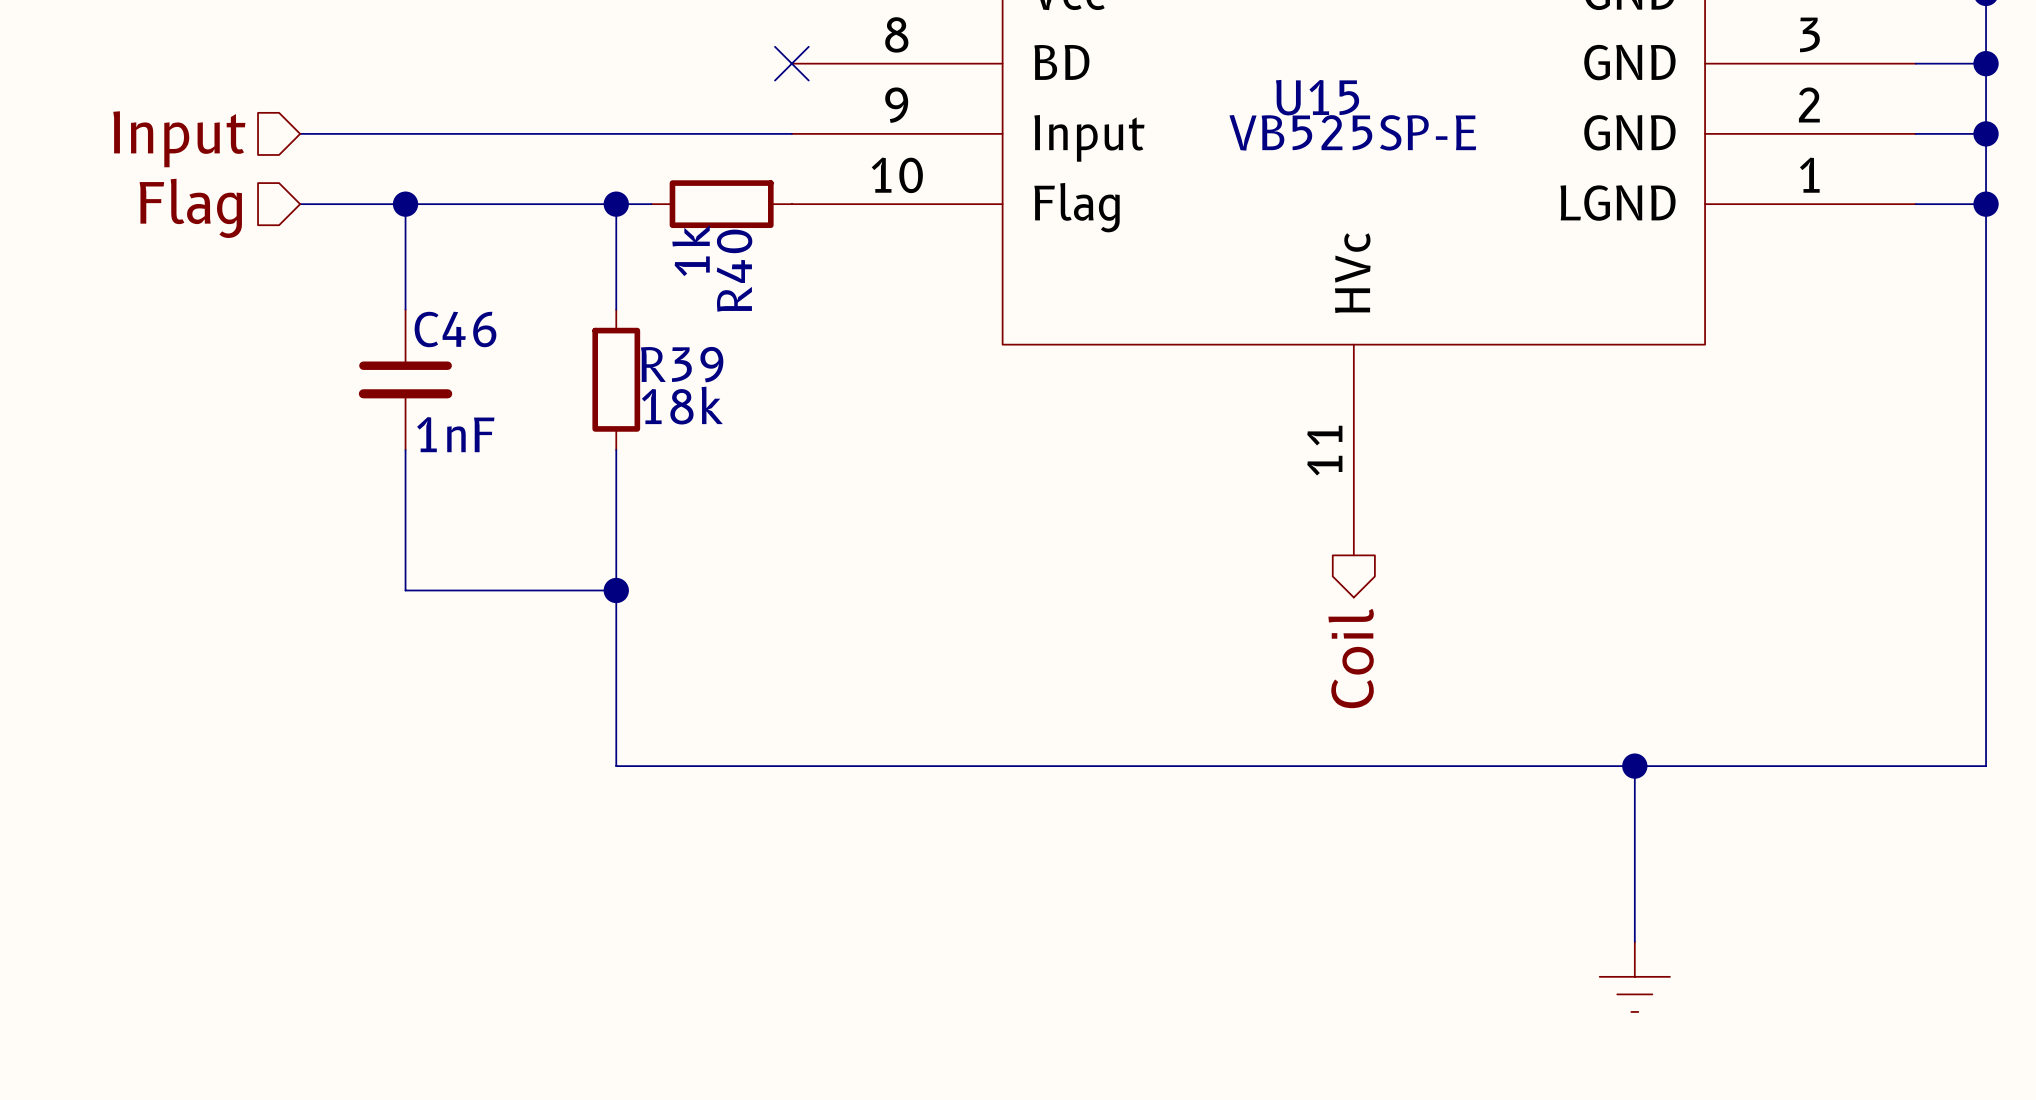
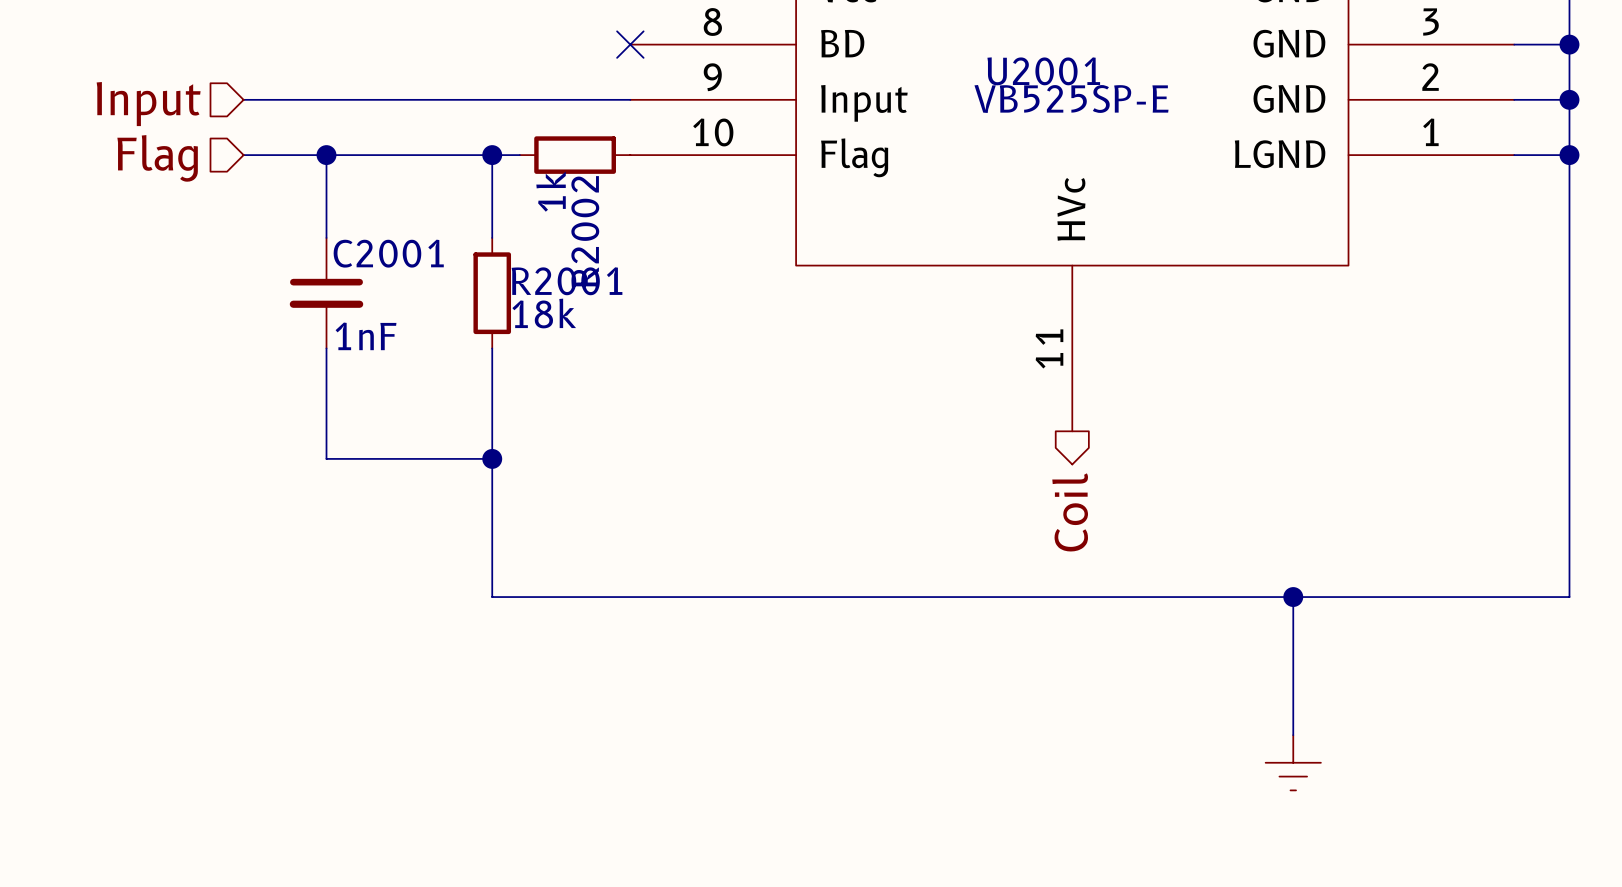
U15 name: U15 (1317, 97) -> U2001 (1043, 71)
R40 name: R40 (734, 270) -> R2002 (585, 231)
C46 name: C46 (455, 329) -> C2001 (388, 253)
R39 name: R39 (682, 364) -> R2001 (567, 281)

